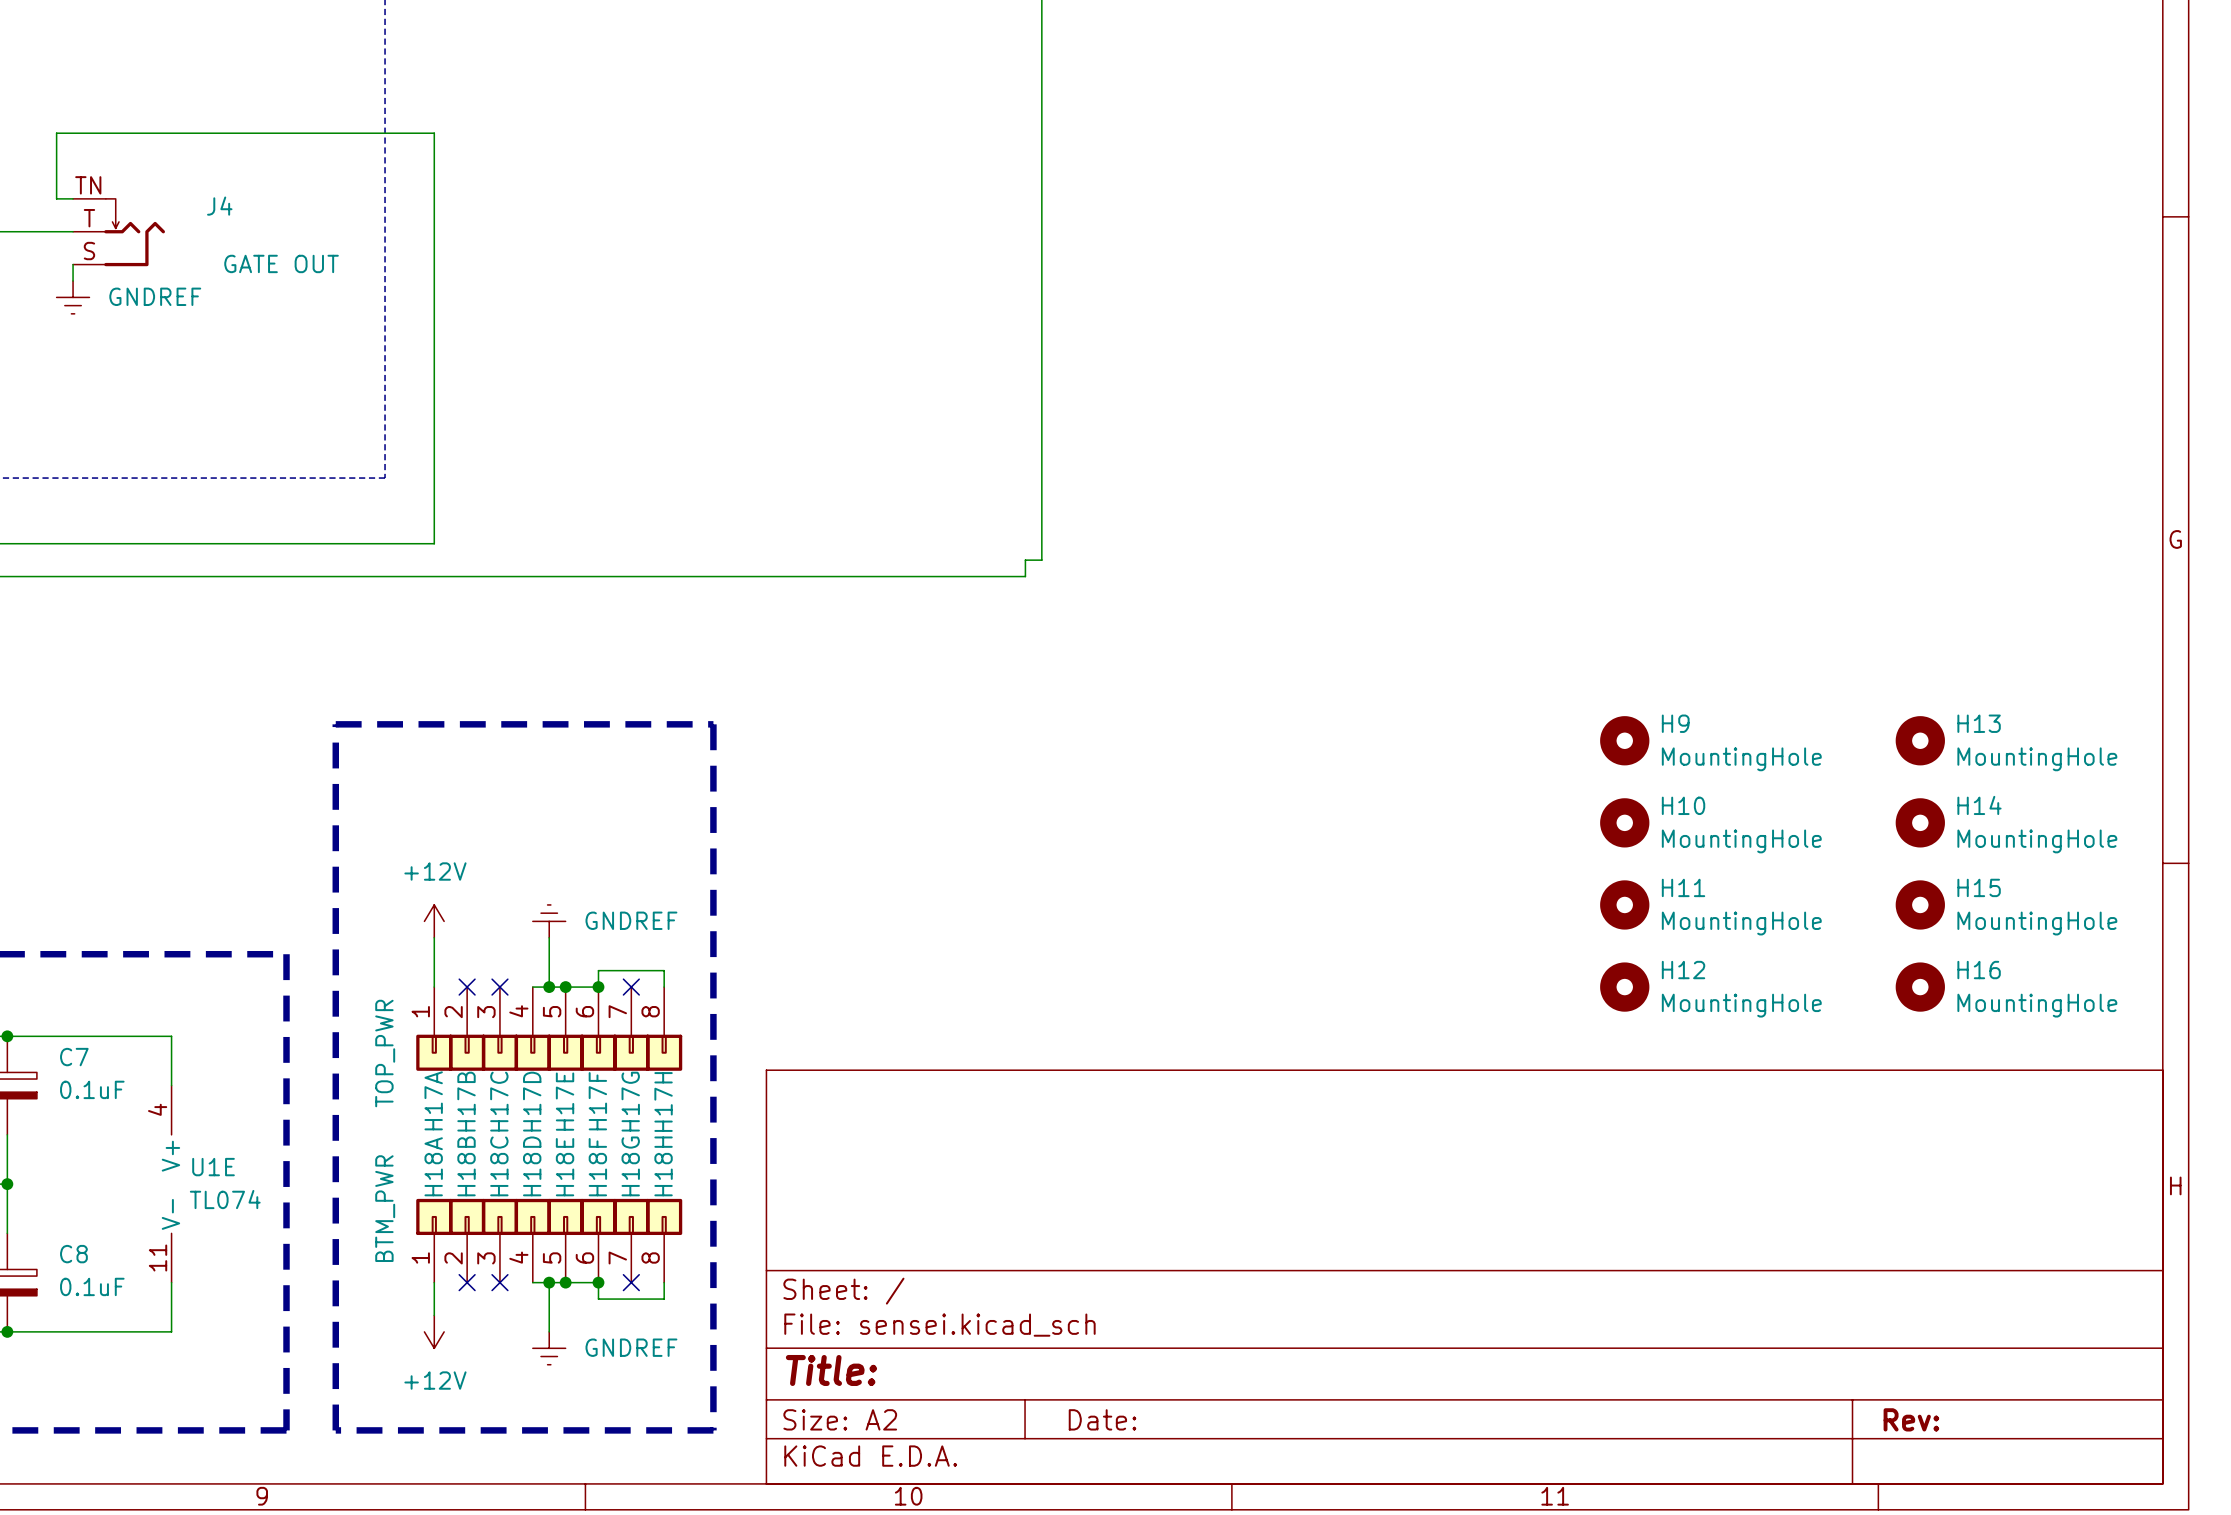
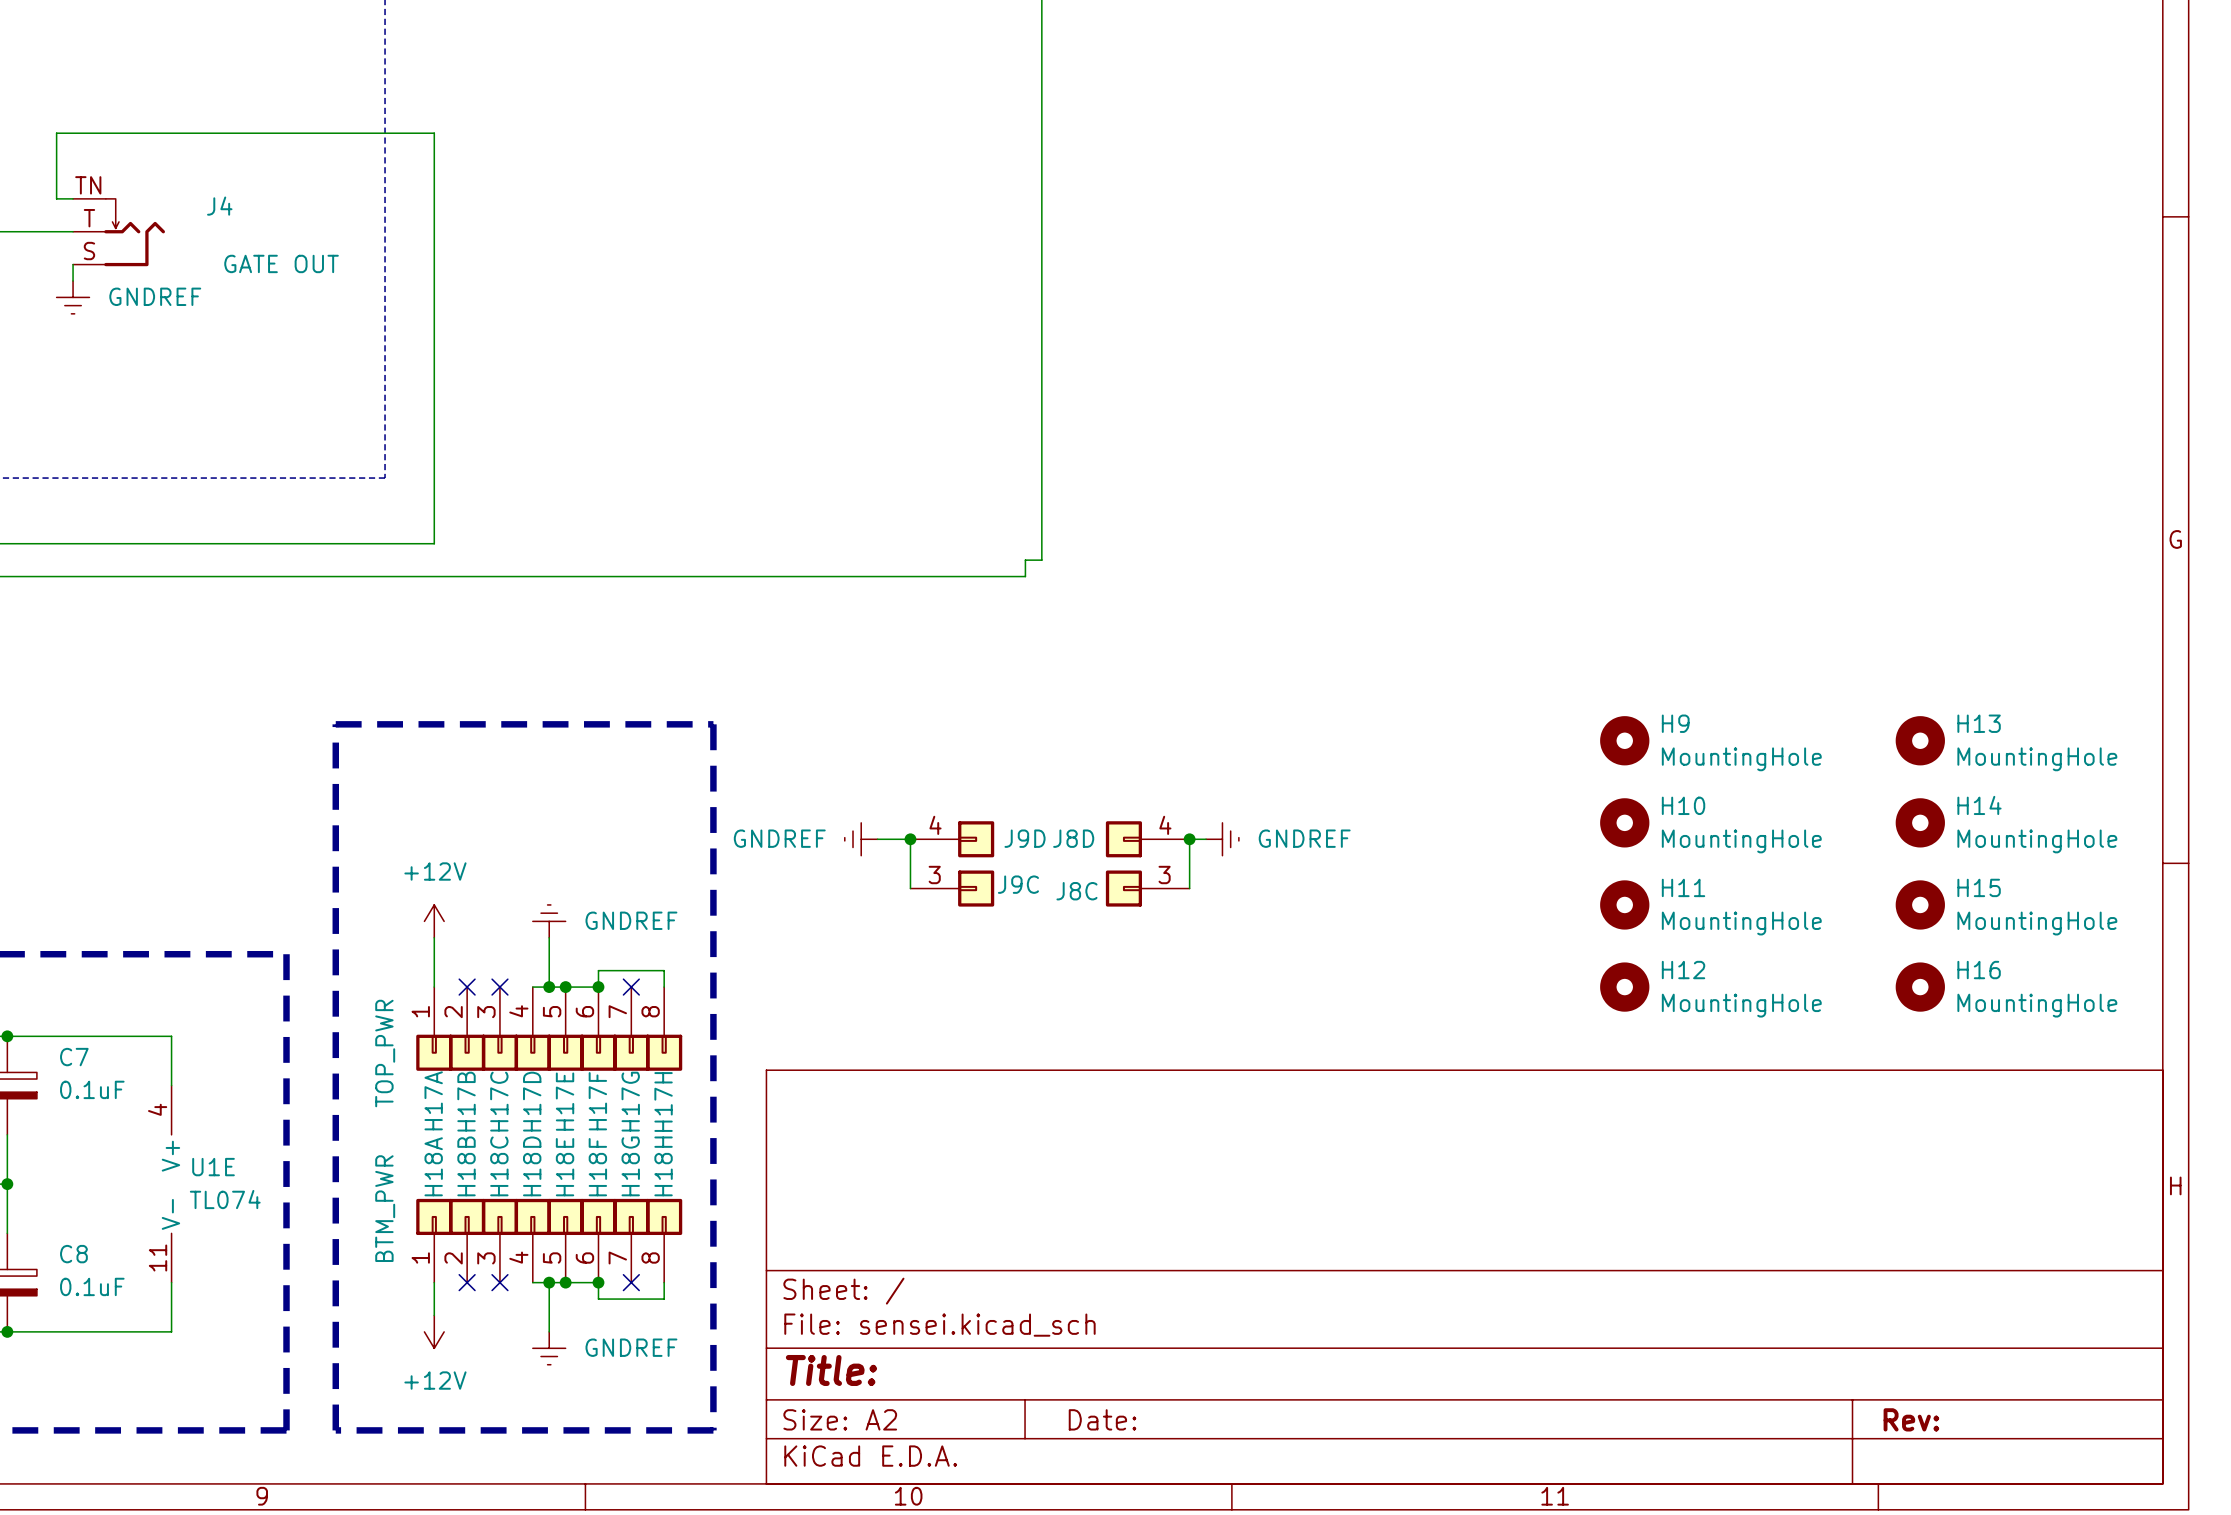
power symbol: none -> GNDREF (861, 839)
wire: none -> (877, 839) (910, 839) (910, 888)
junction: none -> (910, 839)
J9D: none -> (952, 839)
J8D: none -> (1147, 839)
junction: none -> (1189, 839)
wire: none -> (1206, 839) (1189, 839) (1189, 888)
power symbol: none -> GNDREF (1222, 839)
J9C: none -> (952, 888)
J8C: none -> (1147, 888)

